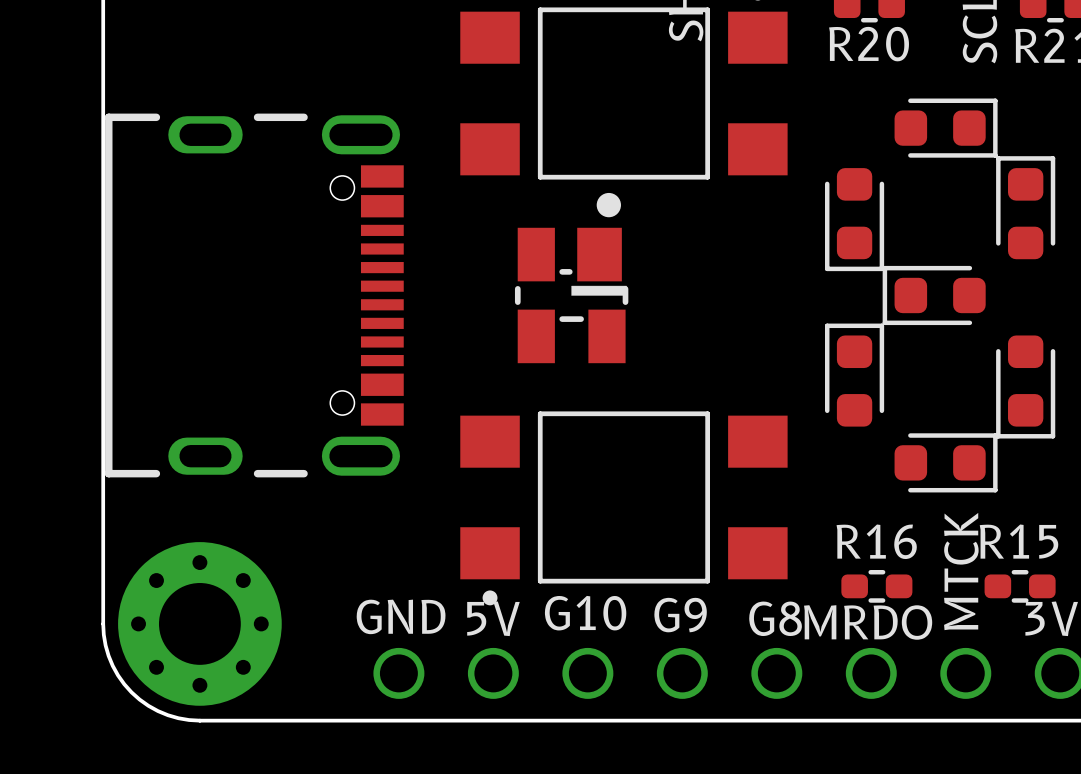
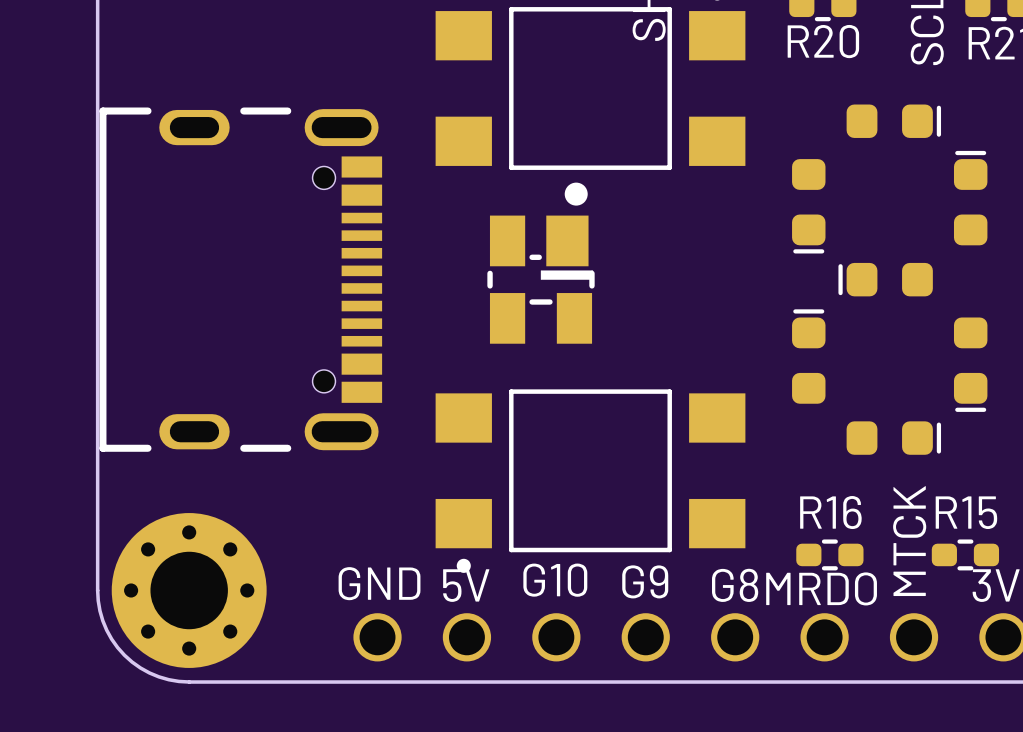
part footprint: [894, 98, 998, 158] -> [846, 104, 942, 138]
part footprint: [996, 156, 1056, 260] -> [953, 150, 988, 246]
part footprint: [824, 168, 885, 272] -> [792, 159, 826, 254]
part footprint: [882, 265, 986, 326] -> [838, 262, 933, 297]
part footprint: [824, 323, 885, 427] -> [792, 309, 826, 404]
part footprint: [996, 335, 1056, 439] -> [953, 317, 988, 412]
part footprint: [894, 433, 998, 493] -> [846, 421, 942, 455]

